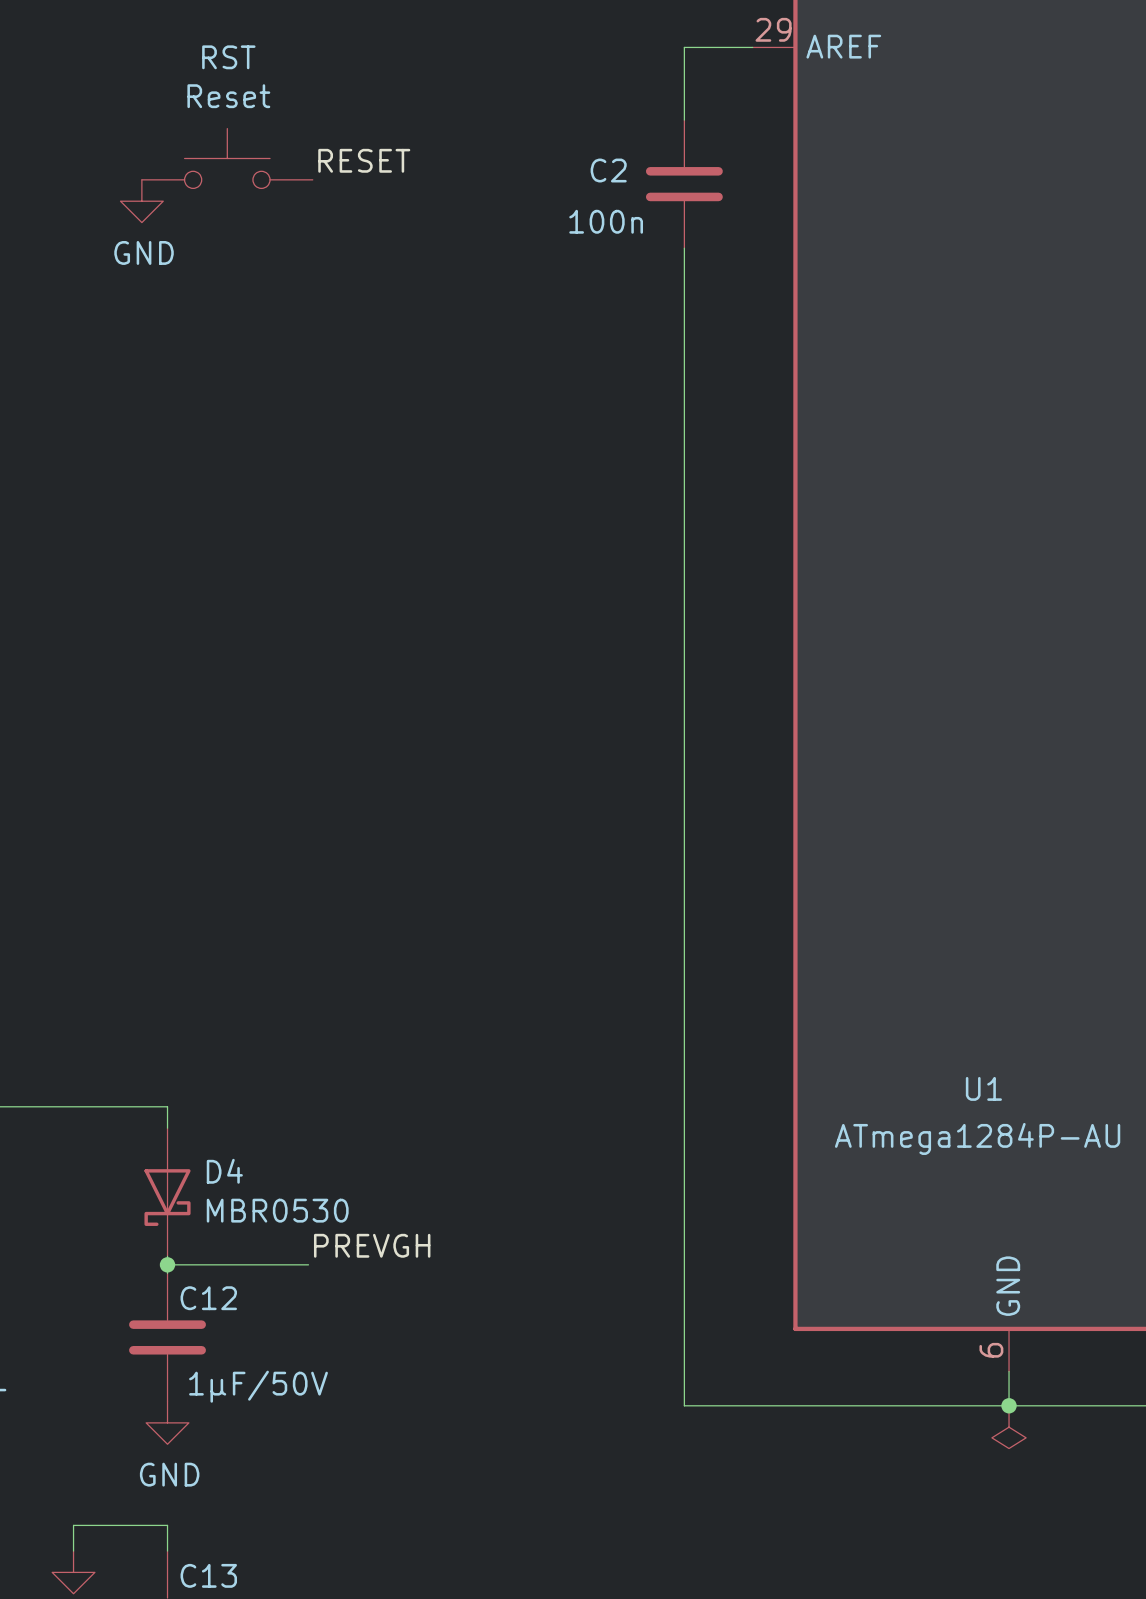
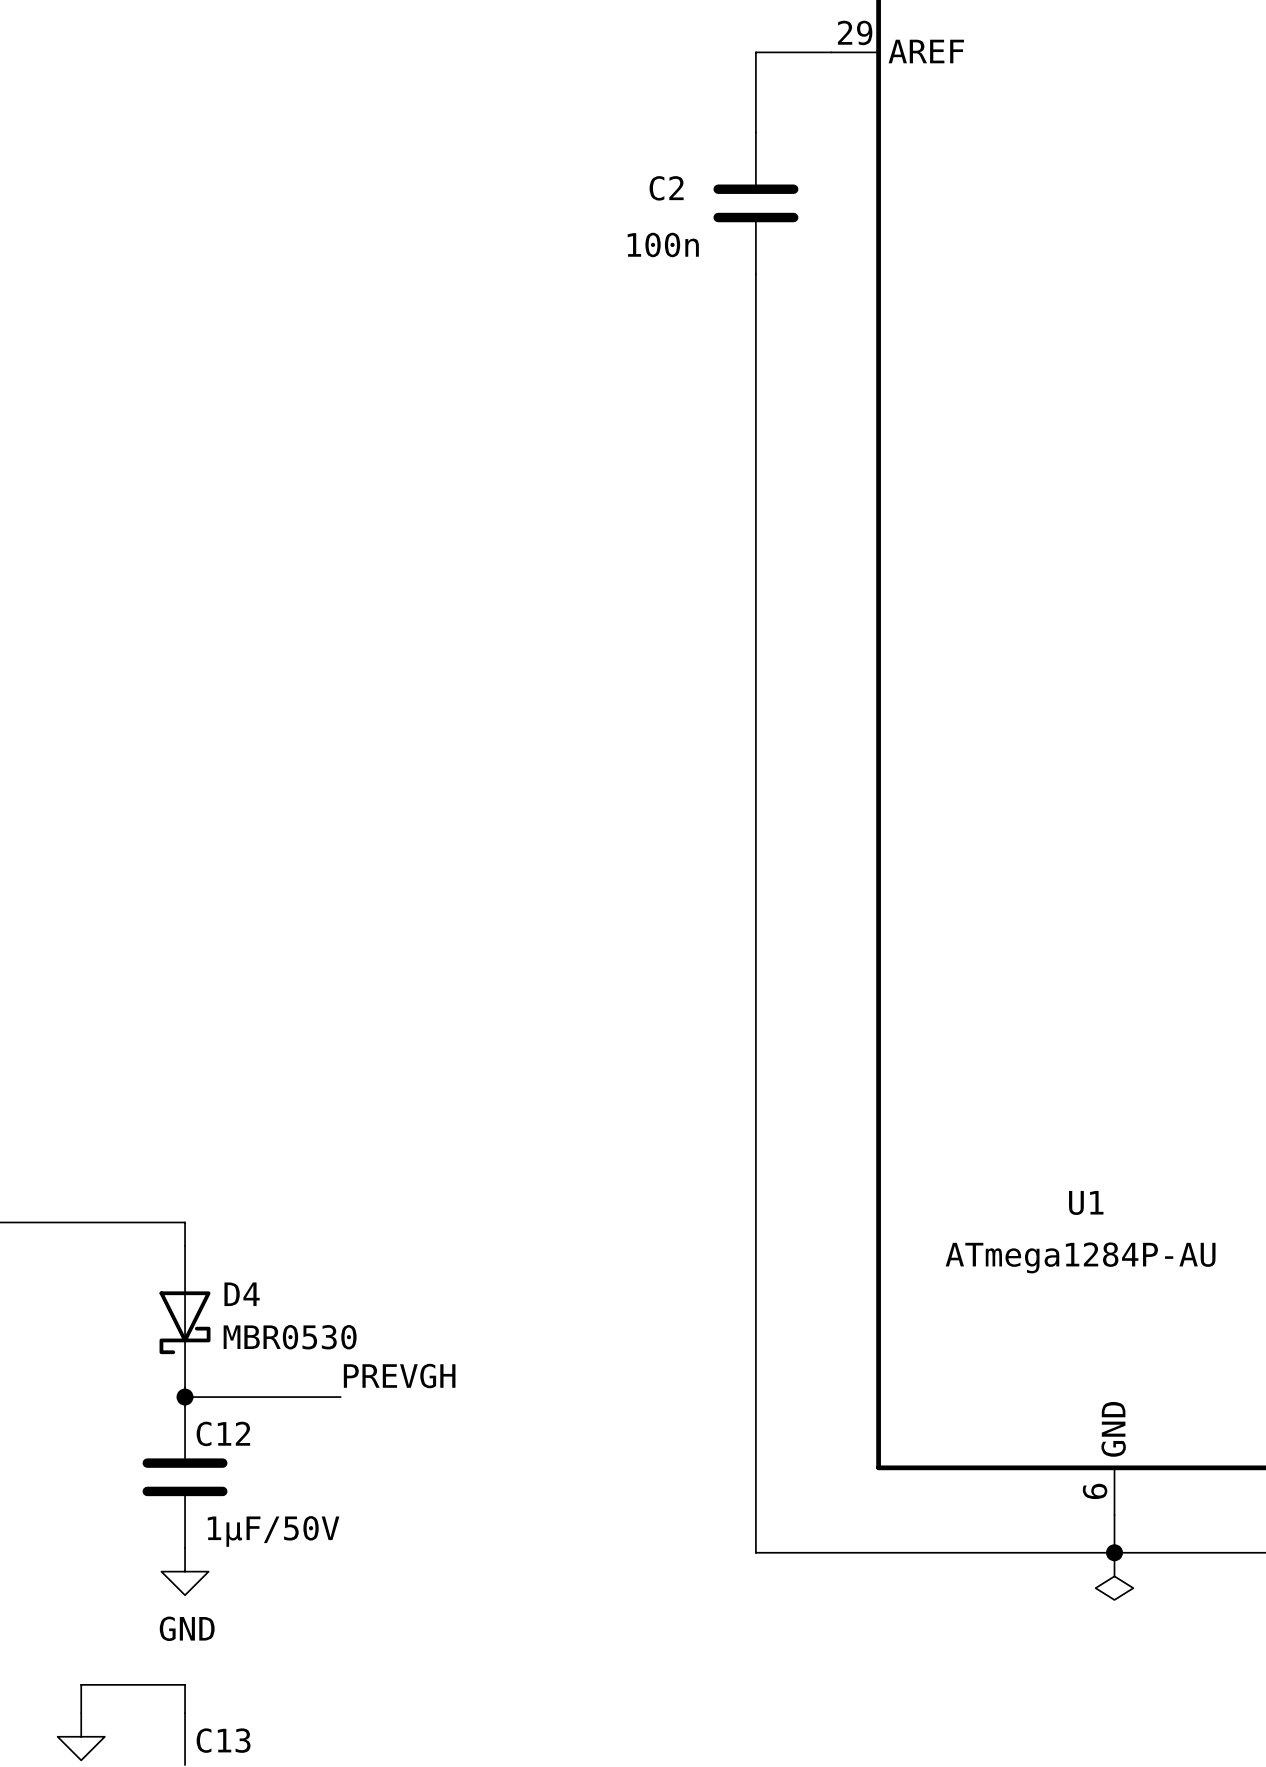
RST: Reset (227, 158) -> none
label: RESET (364, 160) -> none
power symbol: GND (141, 201) -> none

